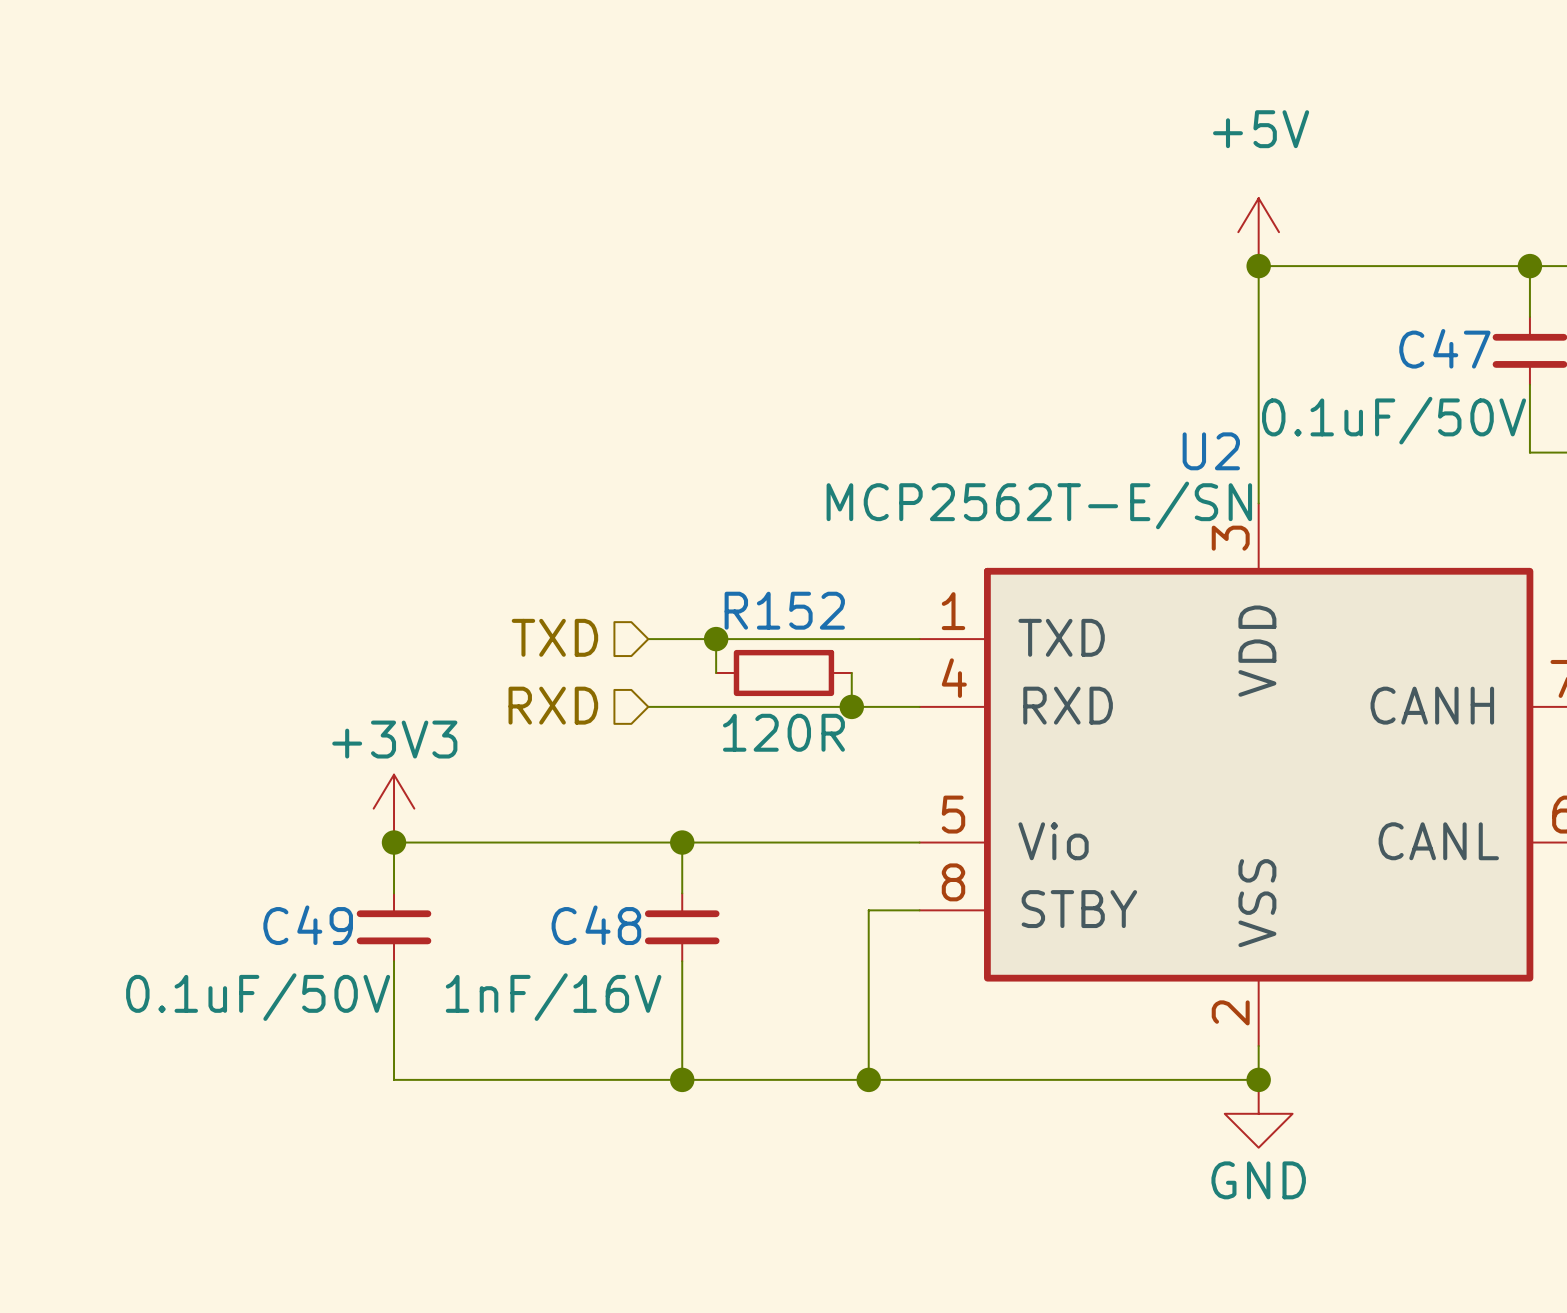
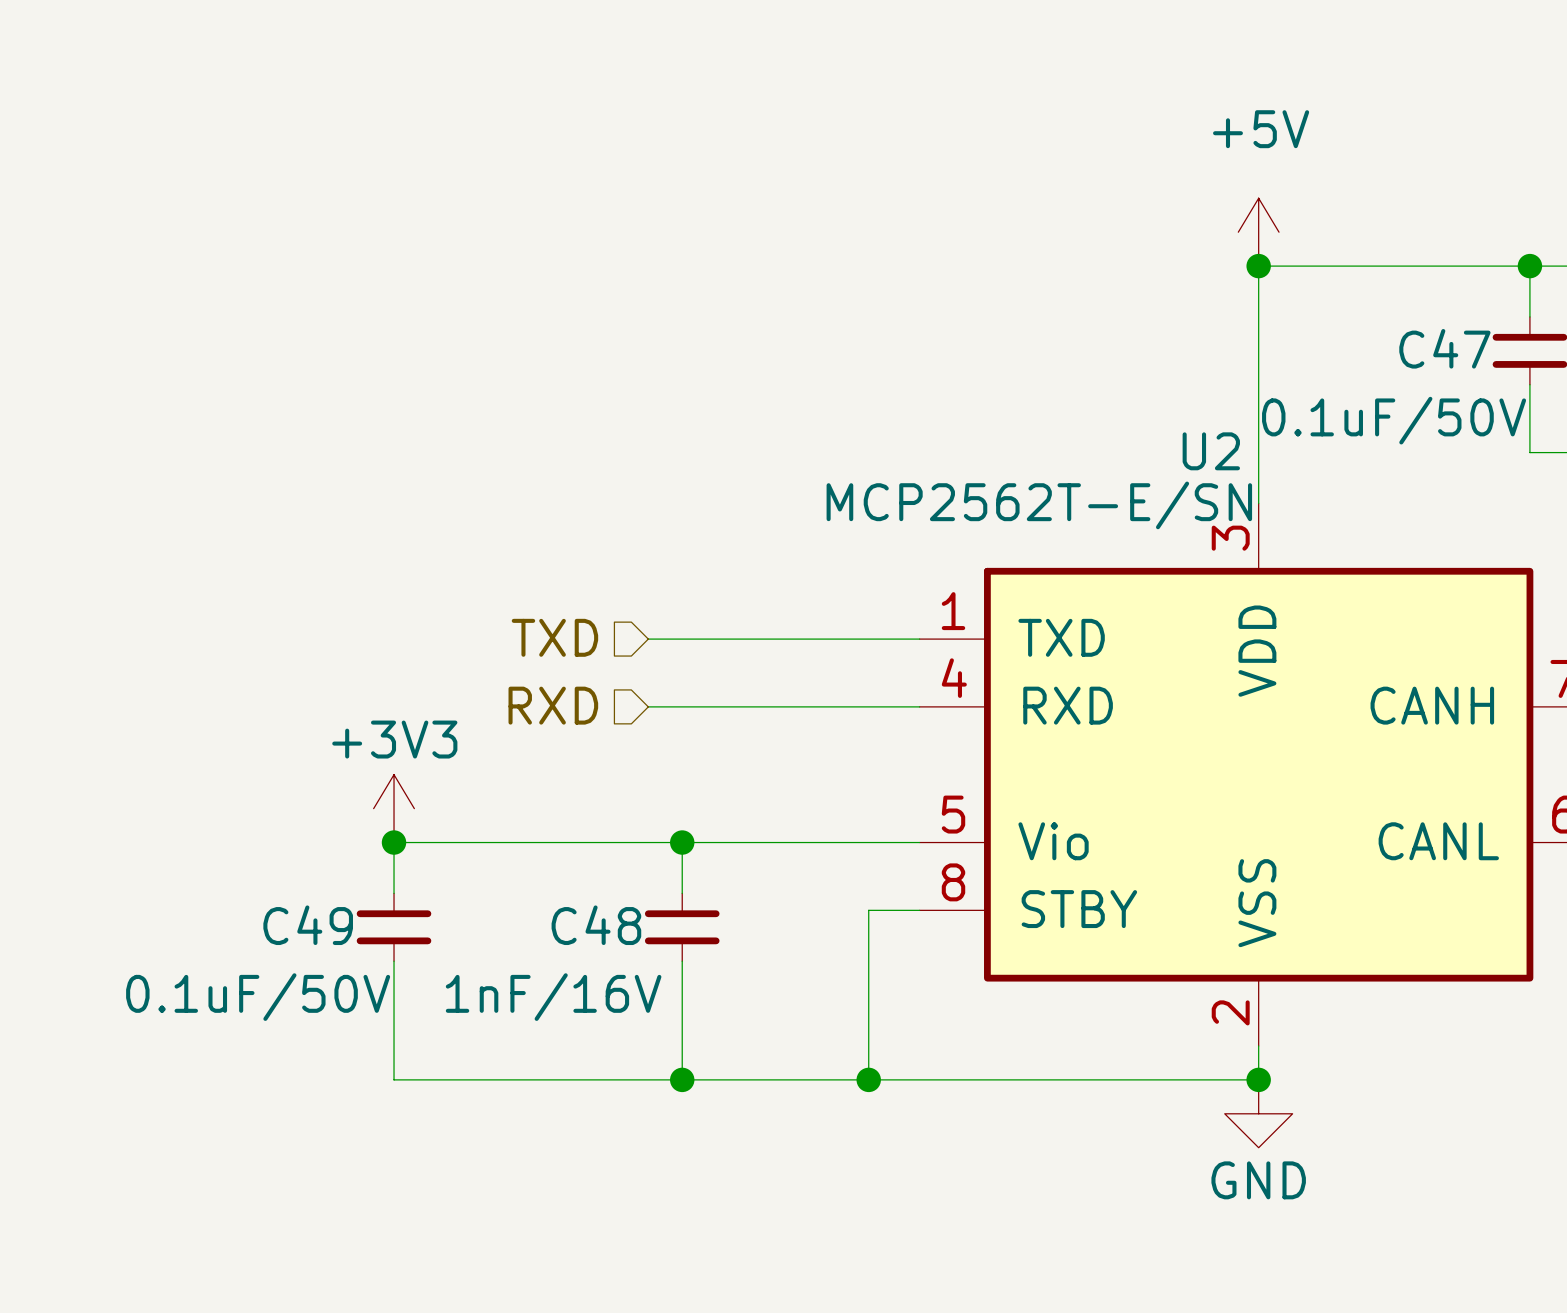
wire: (716, 639) (716, 672) -> none
junction: (716, 639) -> none
R152: 120R (783, 672) -> none
wire: (851, 672) (851, 706) -> none
junction: (851, 706) -> none

